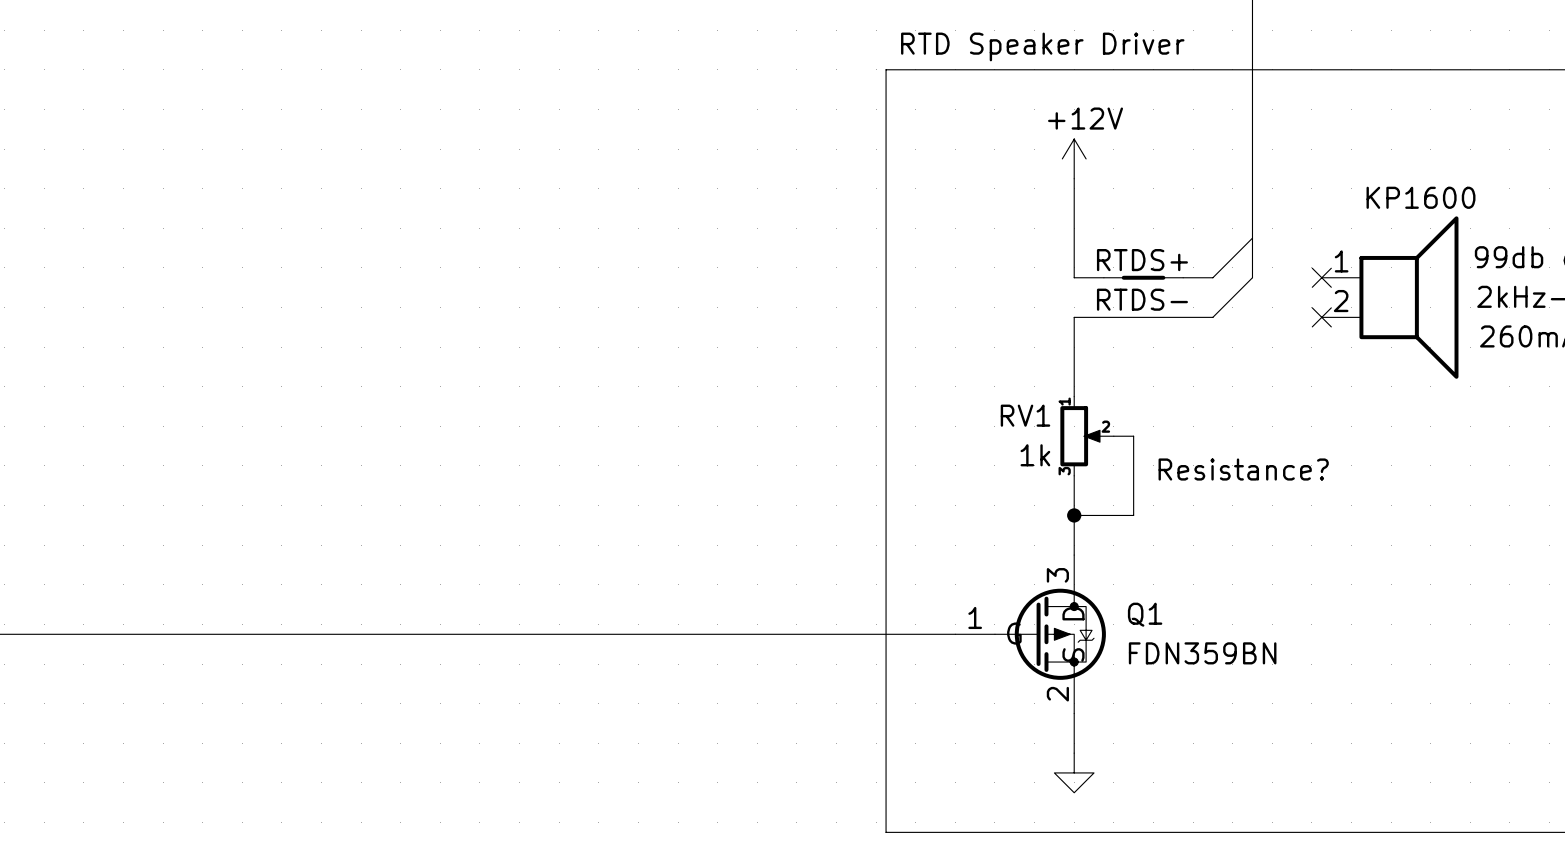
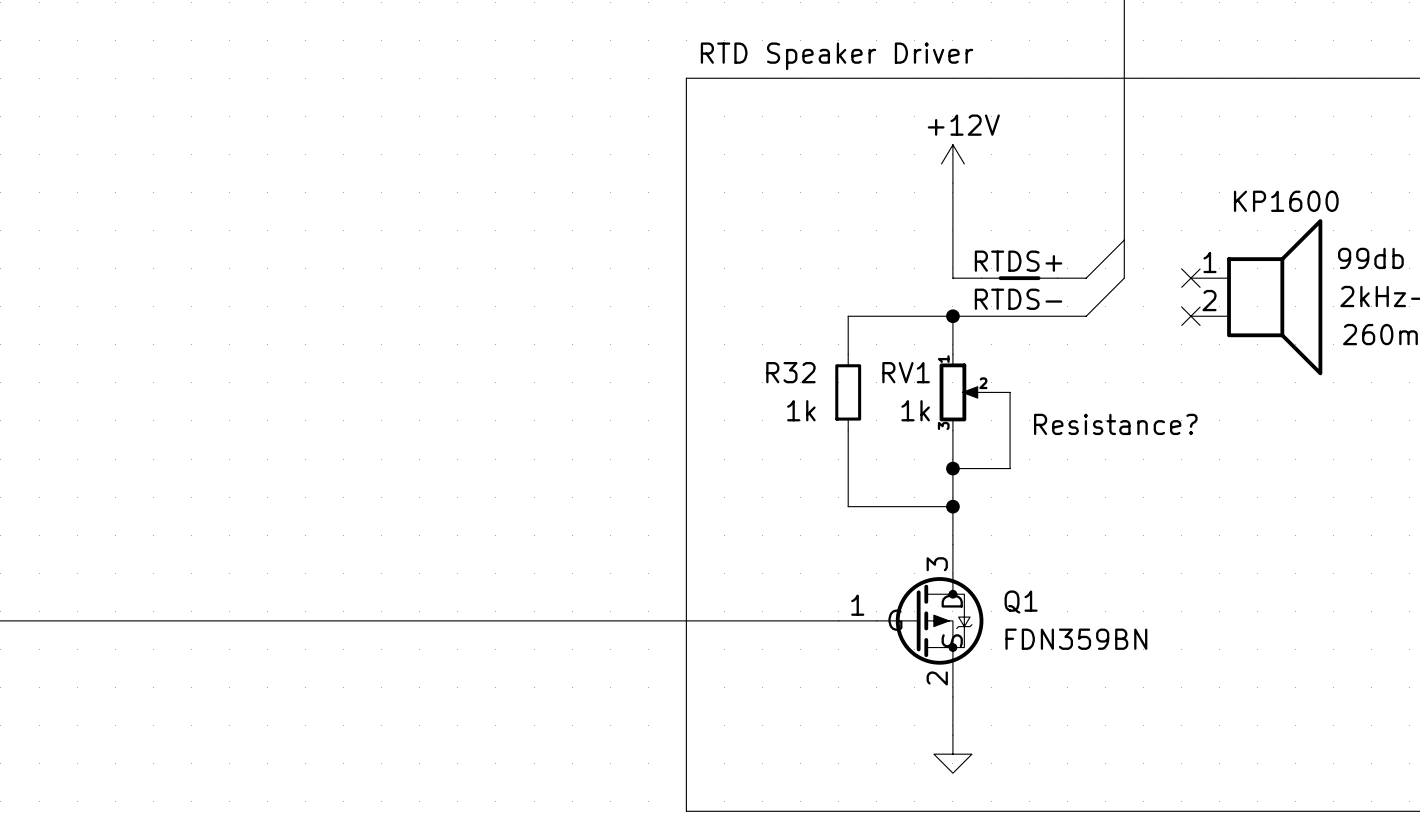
text position: RTD Speaker Driver (1042, 46) -> RTD Speaker Driver (837, 56)
line: (886, 69) (886, 832) -> (772, 78) (686, 78) (686, 811) (772, 811)
wire: none -> (952, 316) (848, 316) (848, 354)
junction: none -> (952, 316)
wire: (1074, 356) (1074, 396) -> none
R32: none -> 1k (848, 392)
wire: none -> (848, 430) (848, 506) (952, 506)
RV1 position: (1087, 436) -> (965, 392)
wire: (1113, 436) (1133, 436) -> (991, 392) (1010, 392) (1010, 430)
text position: Resistance? (1243, 469) -> Resistance? (1115, 424)
junction: none -> (952, 468)
wire: (1133, 475) (1133, 515) (1074, 515) -> (1010, 468) (952, 468) (952, 430)

